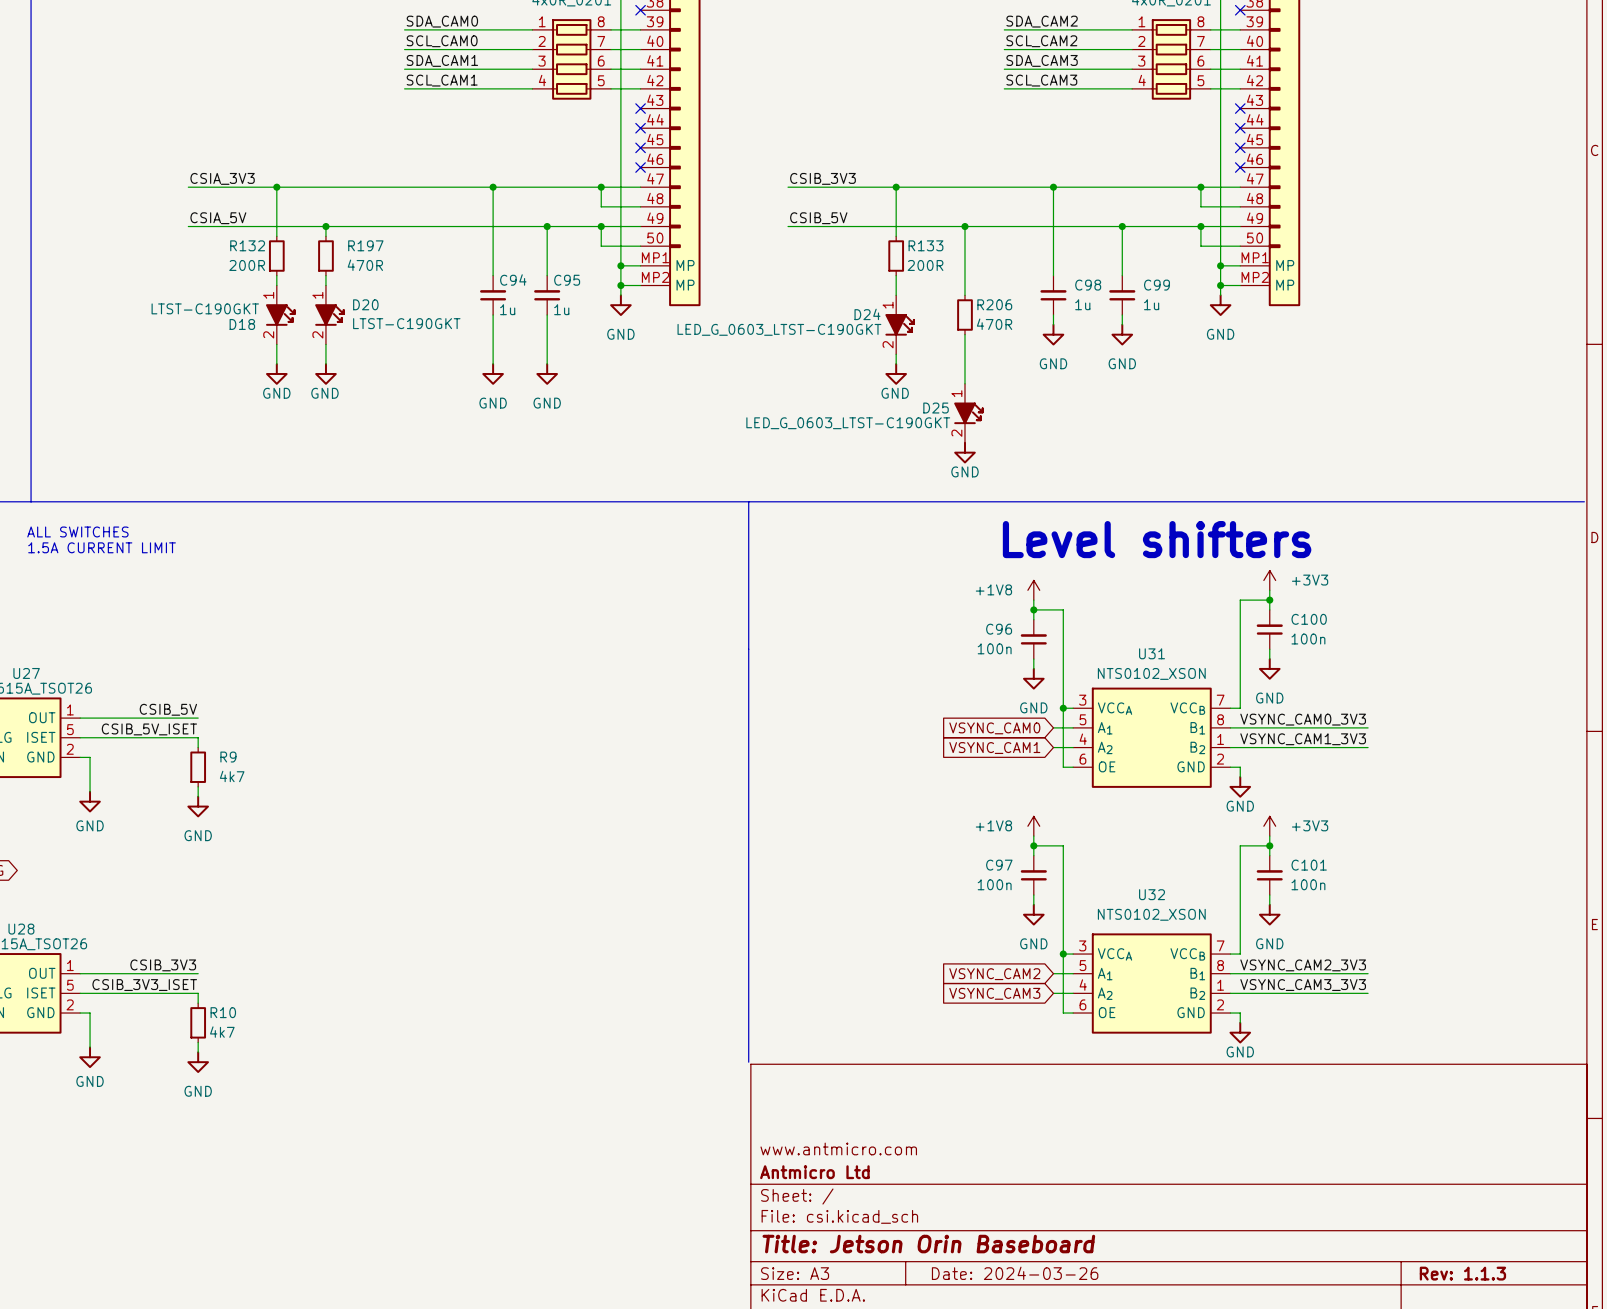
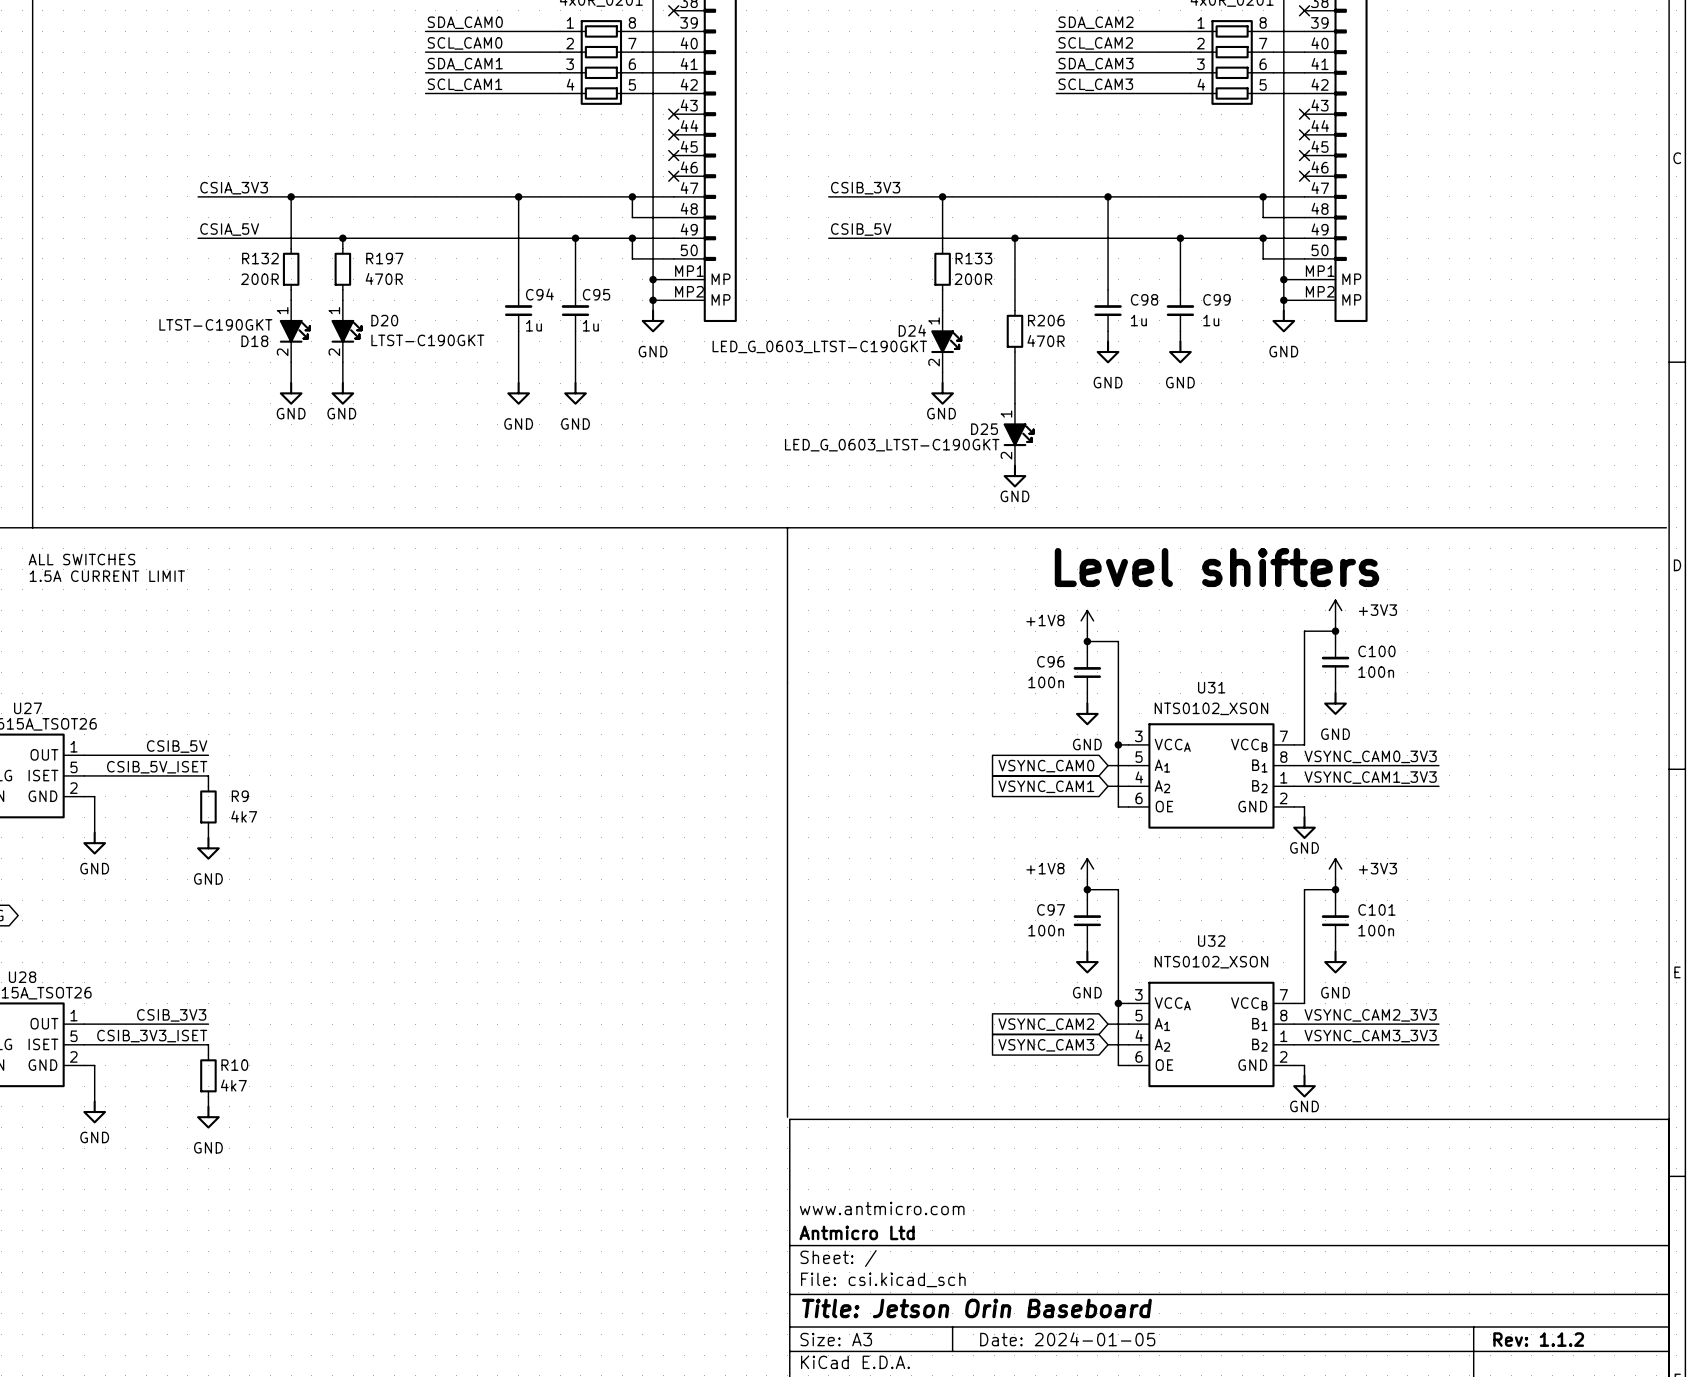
title block: Date: 2024-03-26 (1015, 1273) -> Date: 2024-01-05 (1067, 1339)
title block: Rev: 1.1.3 (1462, 1273) -> Rev: 1.1.2 (1538, 1339)

